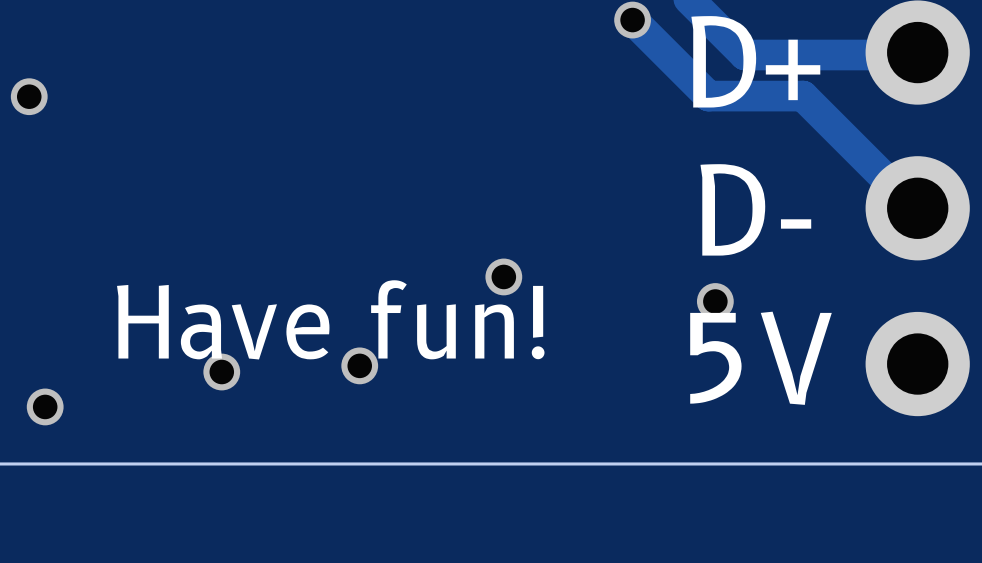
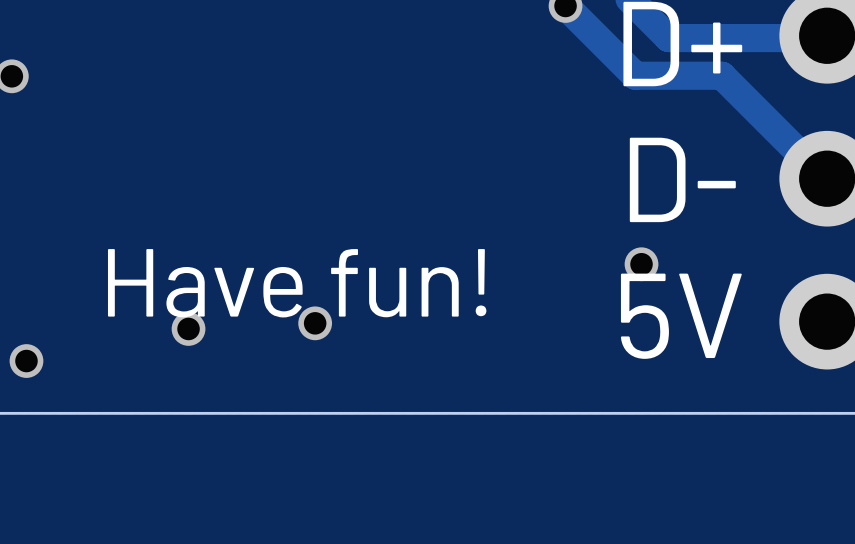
via: (503, 276) -> none

